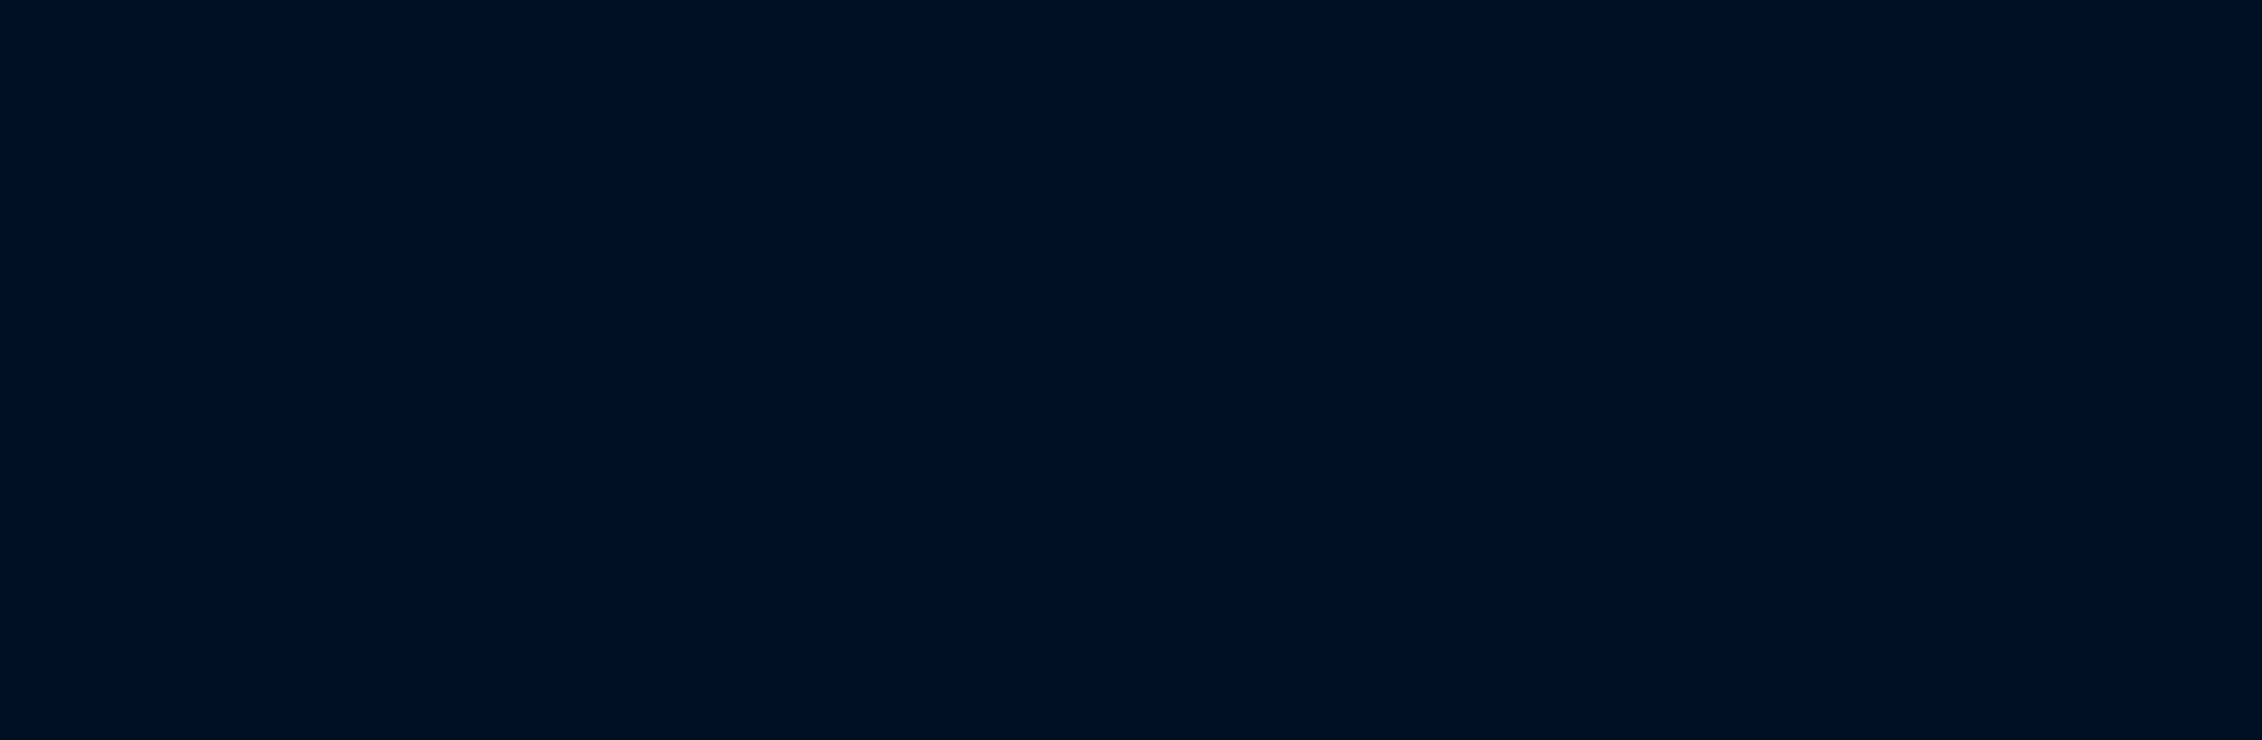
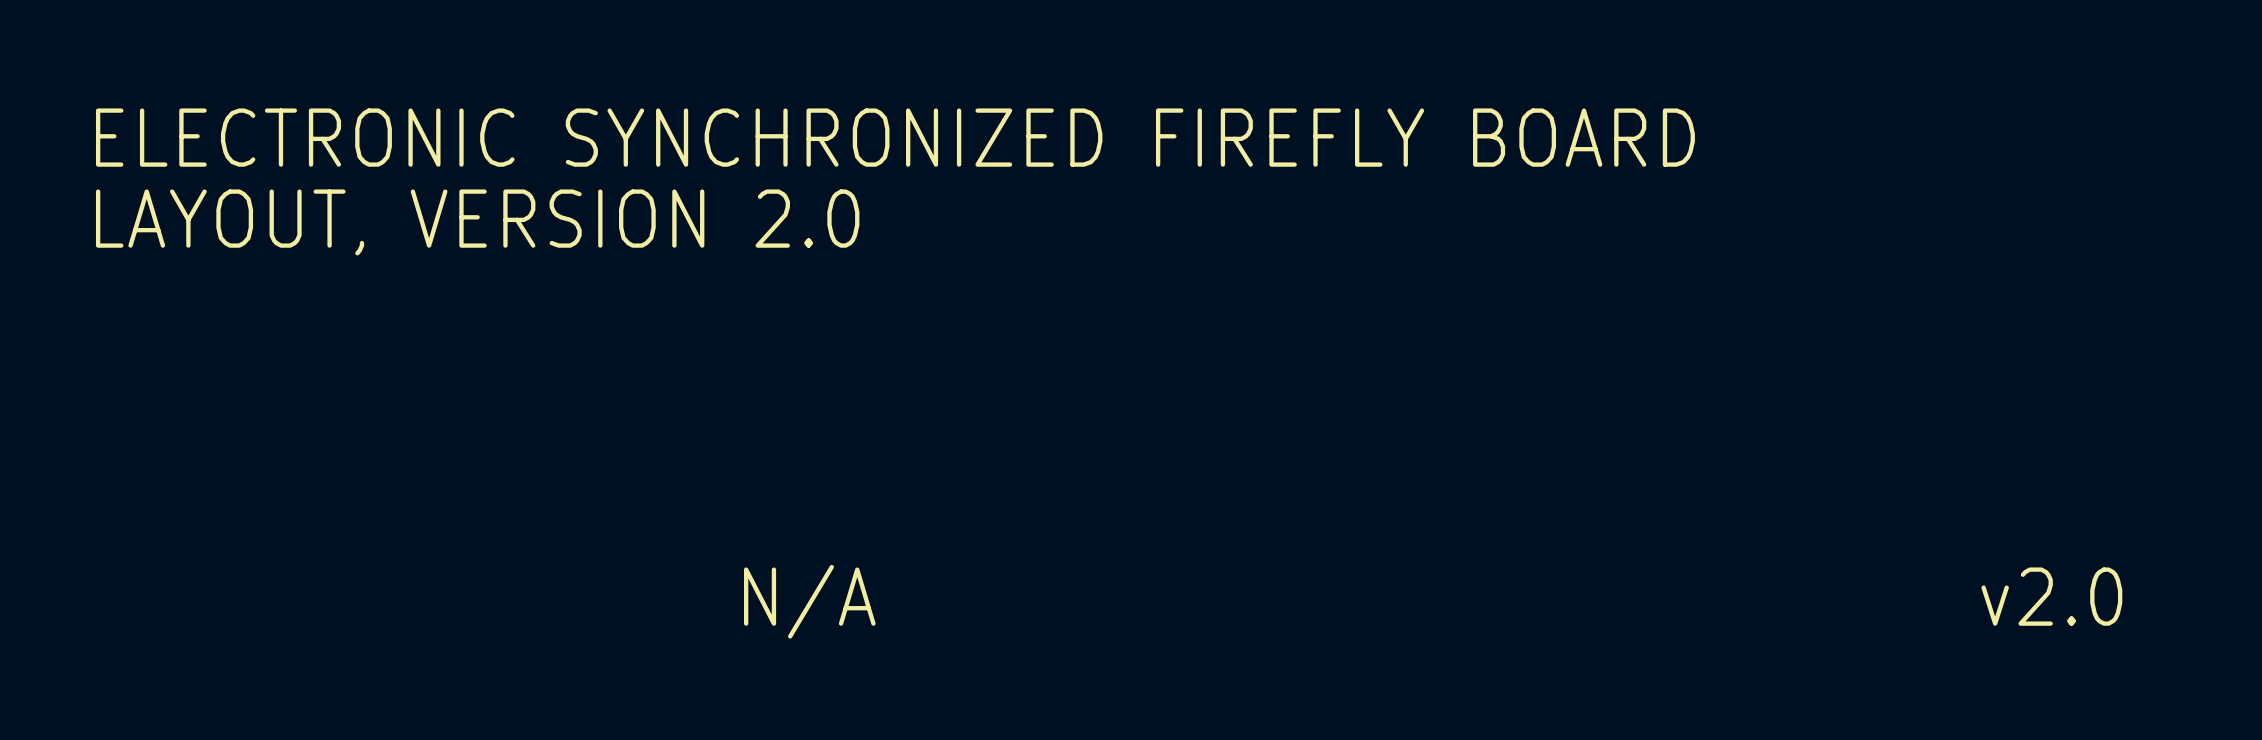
text: none -> ELECTRONIC SYNCHRONIZED FIREFLY BOARD (895, 137)
text: none -> LAYOUT, VERSION 2.0 (477, 222)
text: none -> v2.0 (2051, 596)
text: none -> N/A (809, 601)

